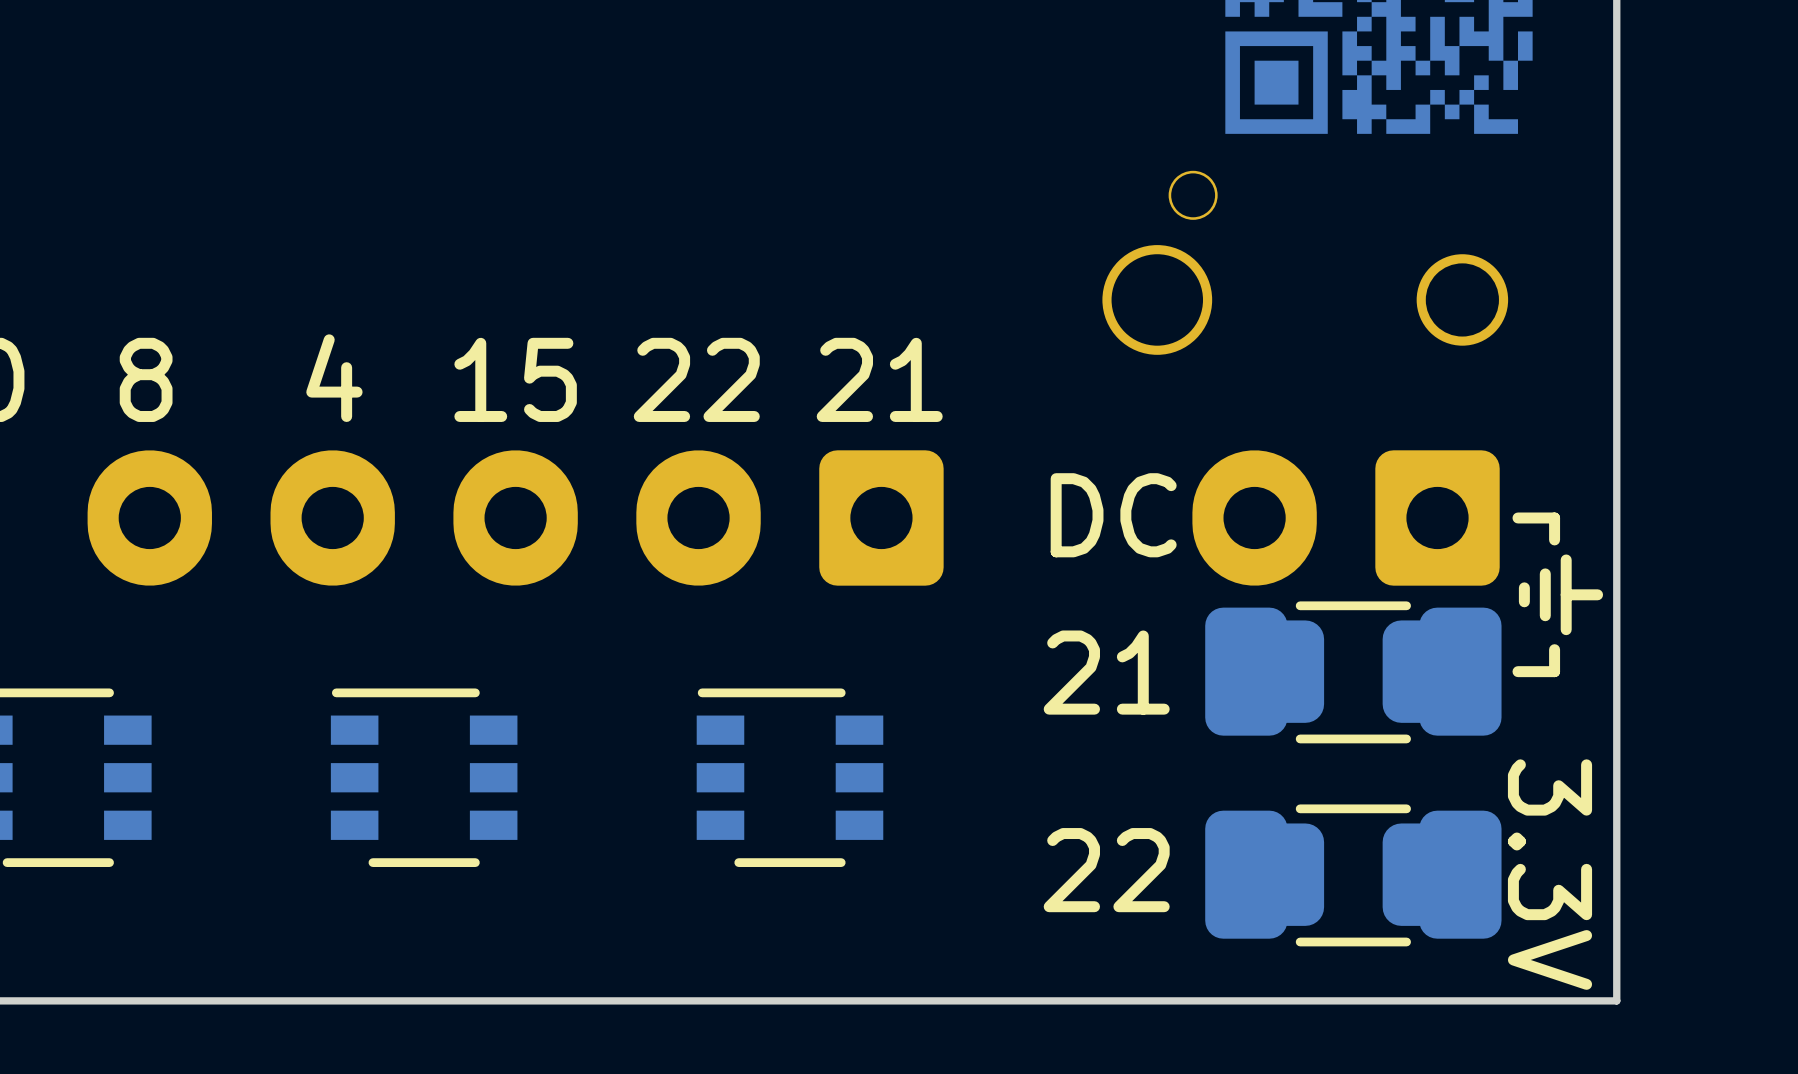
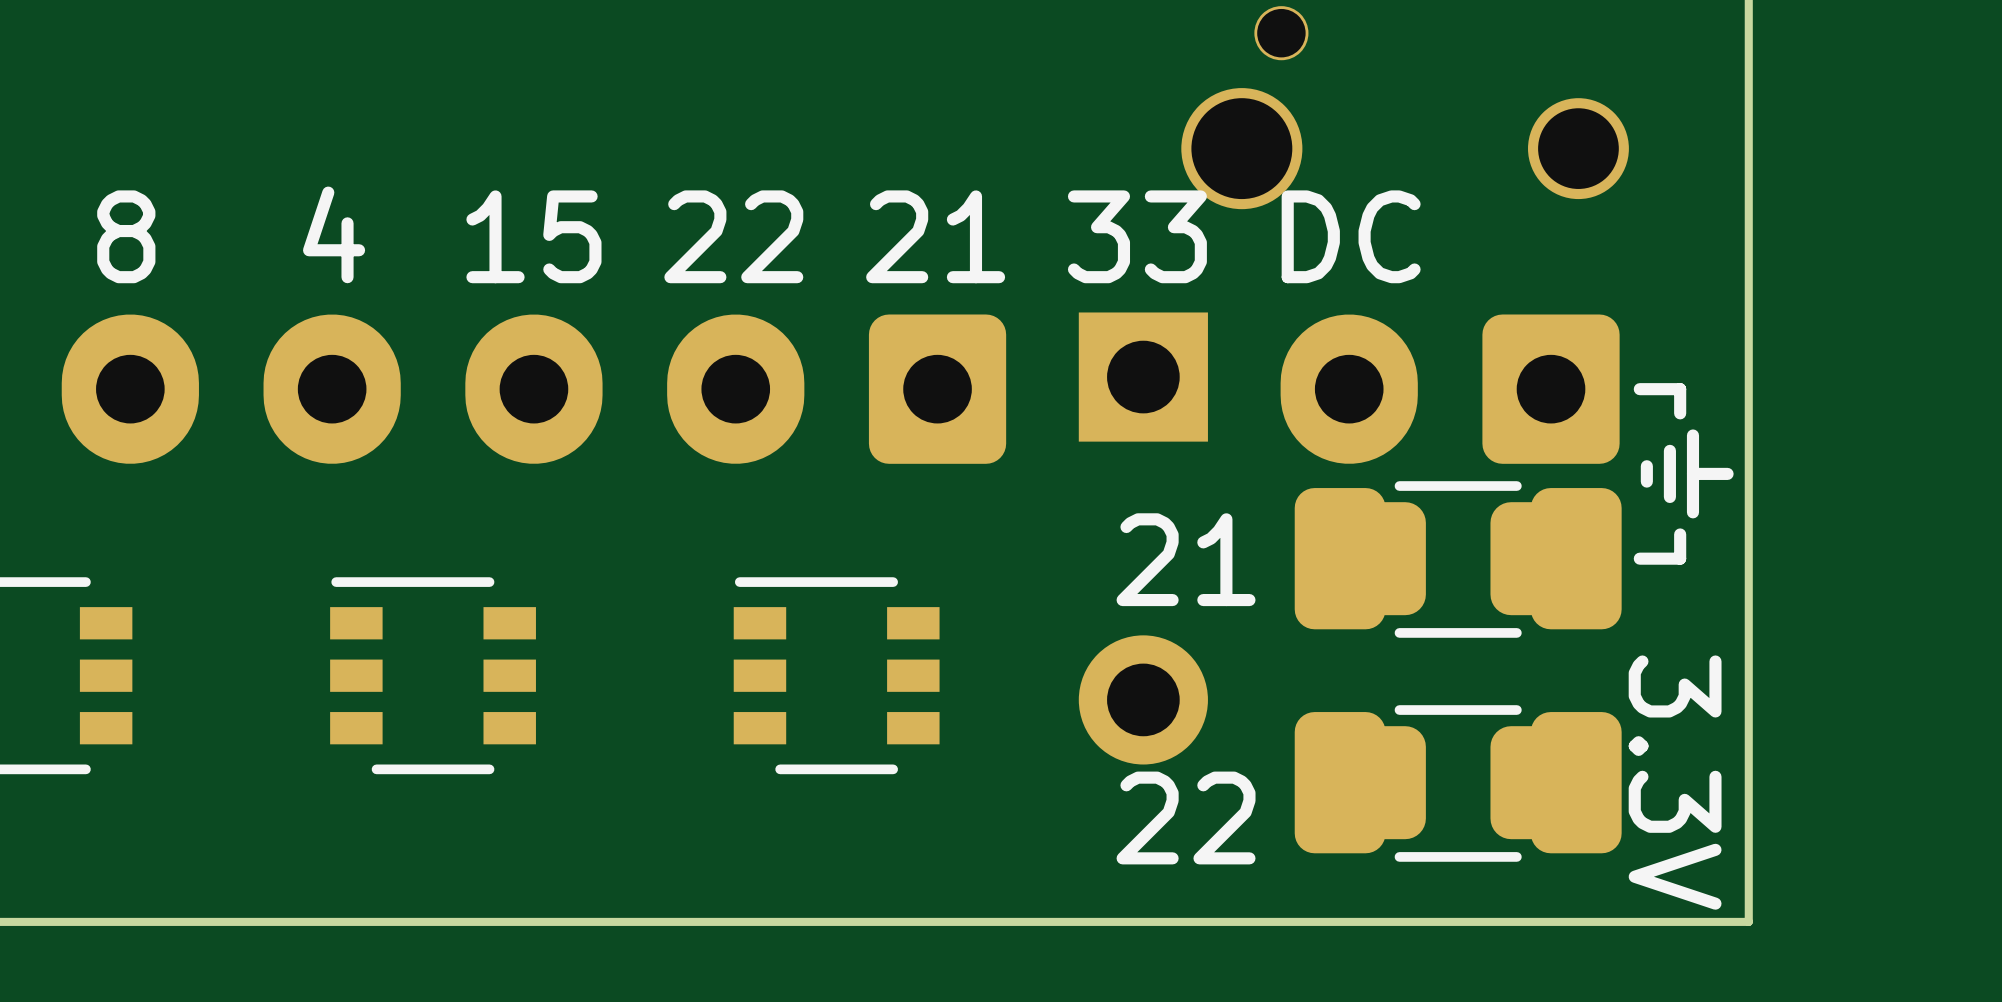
text position: DC (1113, 515) -> DC (1351, 236)
part: none -> (1143, 538)
text position: 22 (1106, 870) -> 22 (1186, 817)

